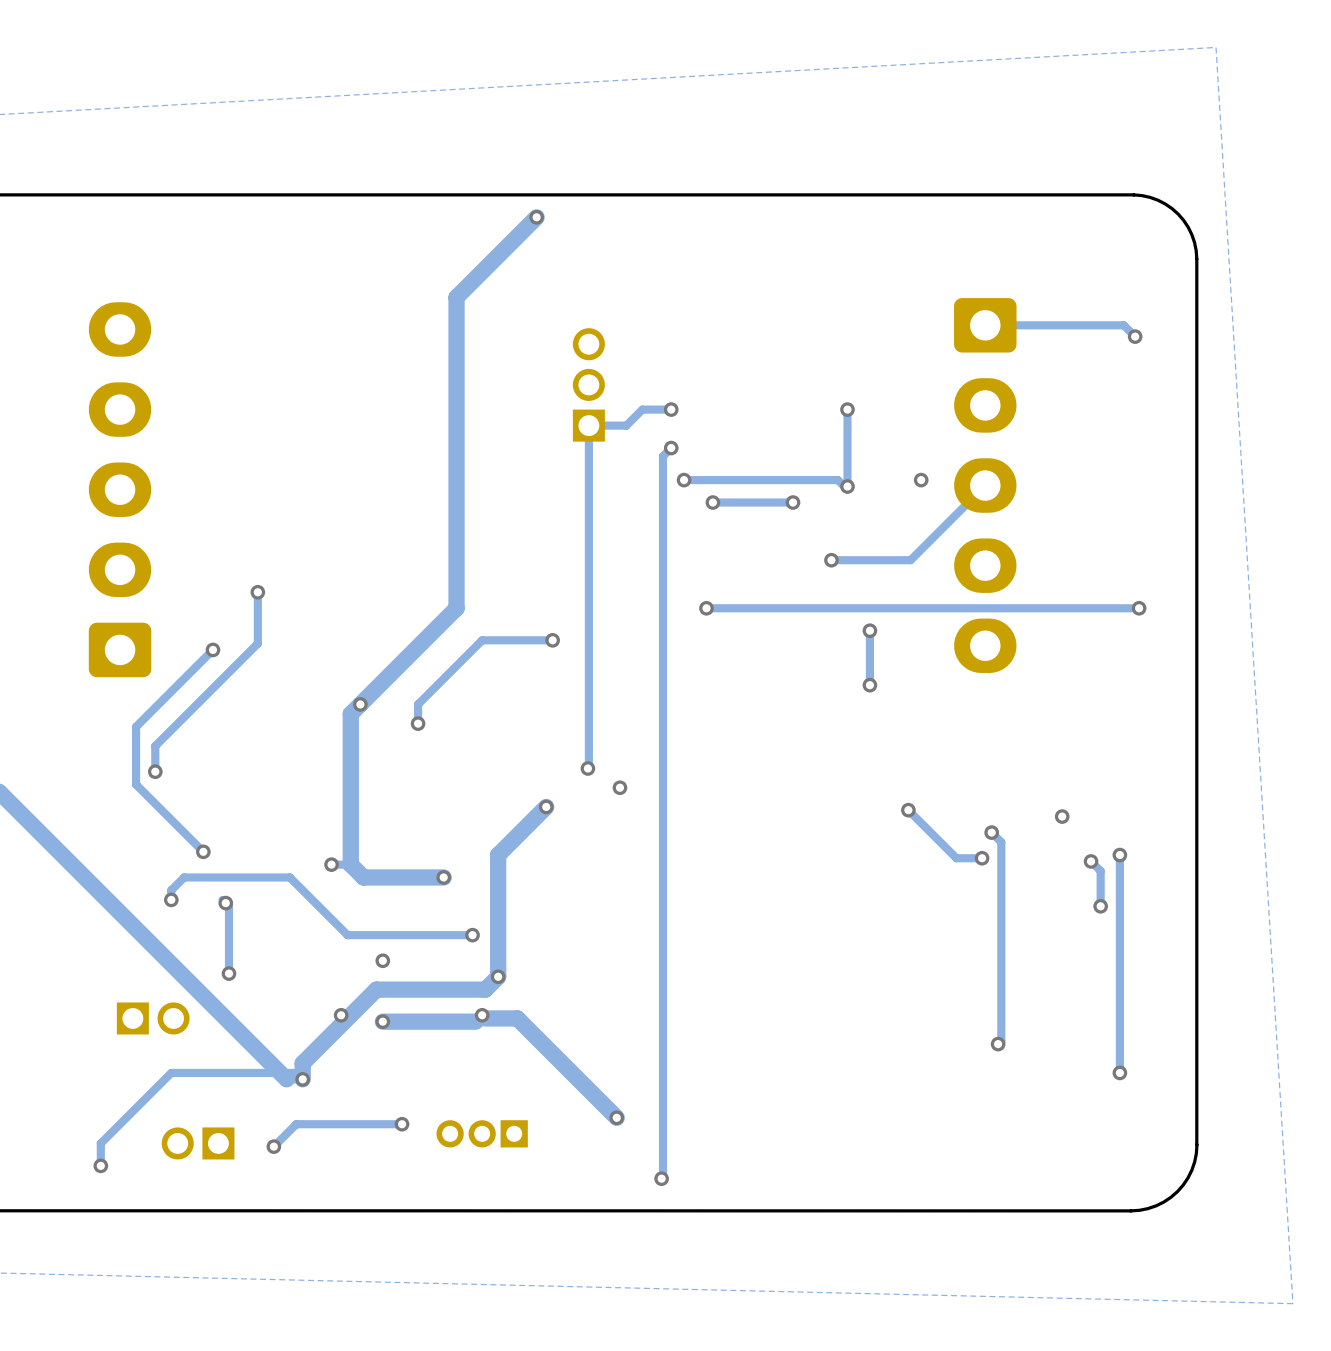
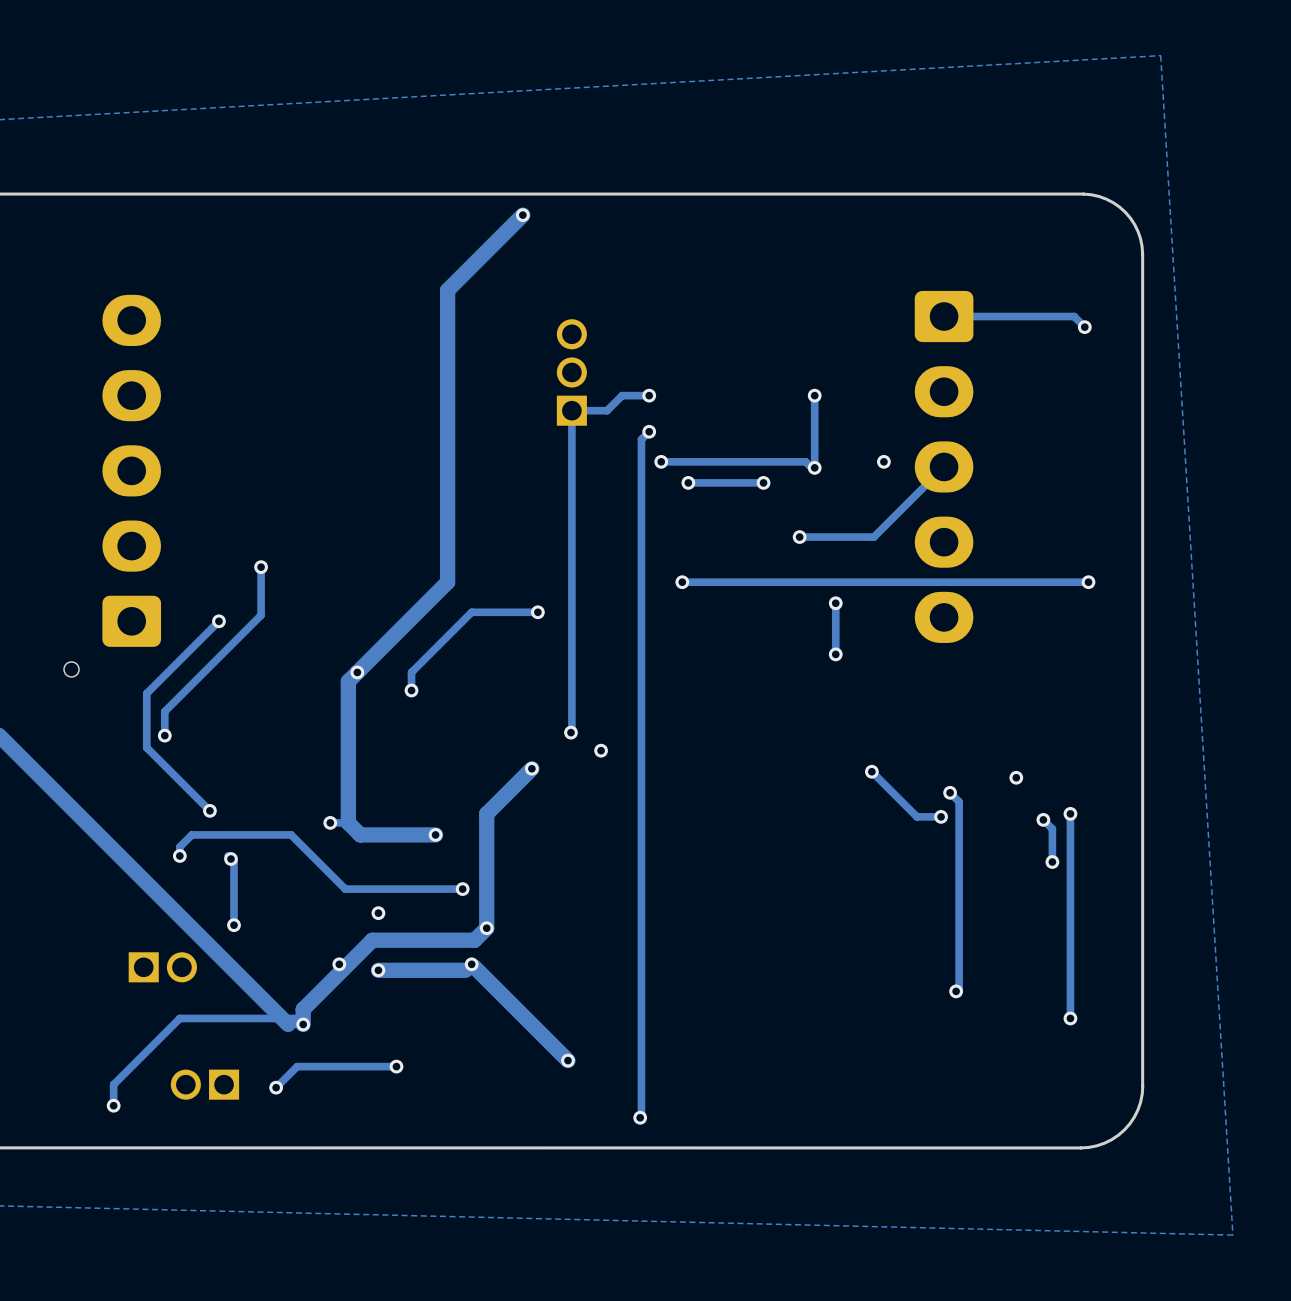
part footprint: [88, 302, 152, 678] -> [64, 294, 162, 677]
track: (485, 1018) (517, 1018) (616, 1117) -> (474, 967) (567, 1060)
via position: (616, 1117) -> (567, 1060)
part: (482, 1133) -> none

